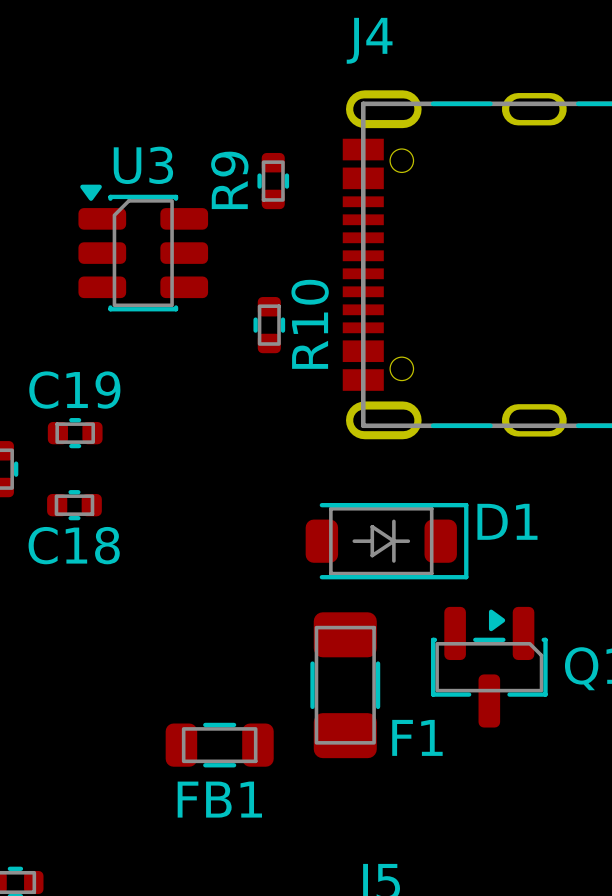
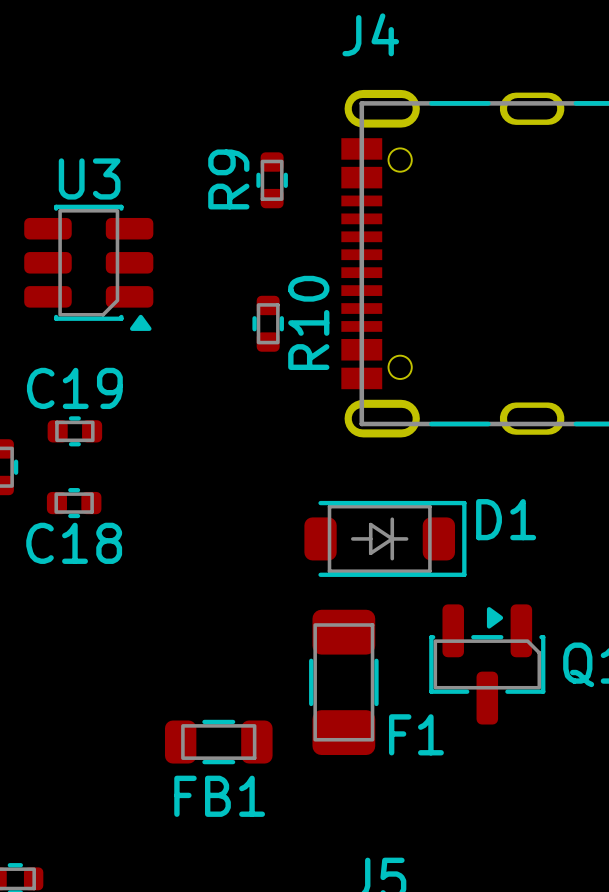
U3 rotation: 0° (143, 248) -> 180° (88, 267)

